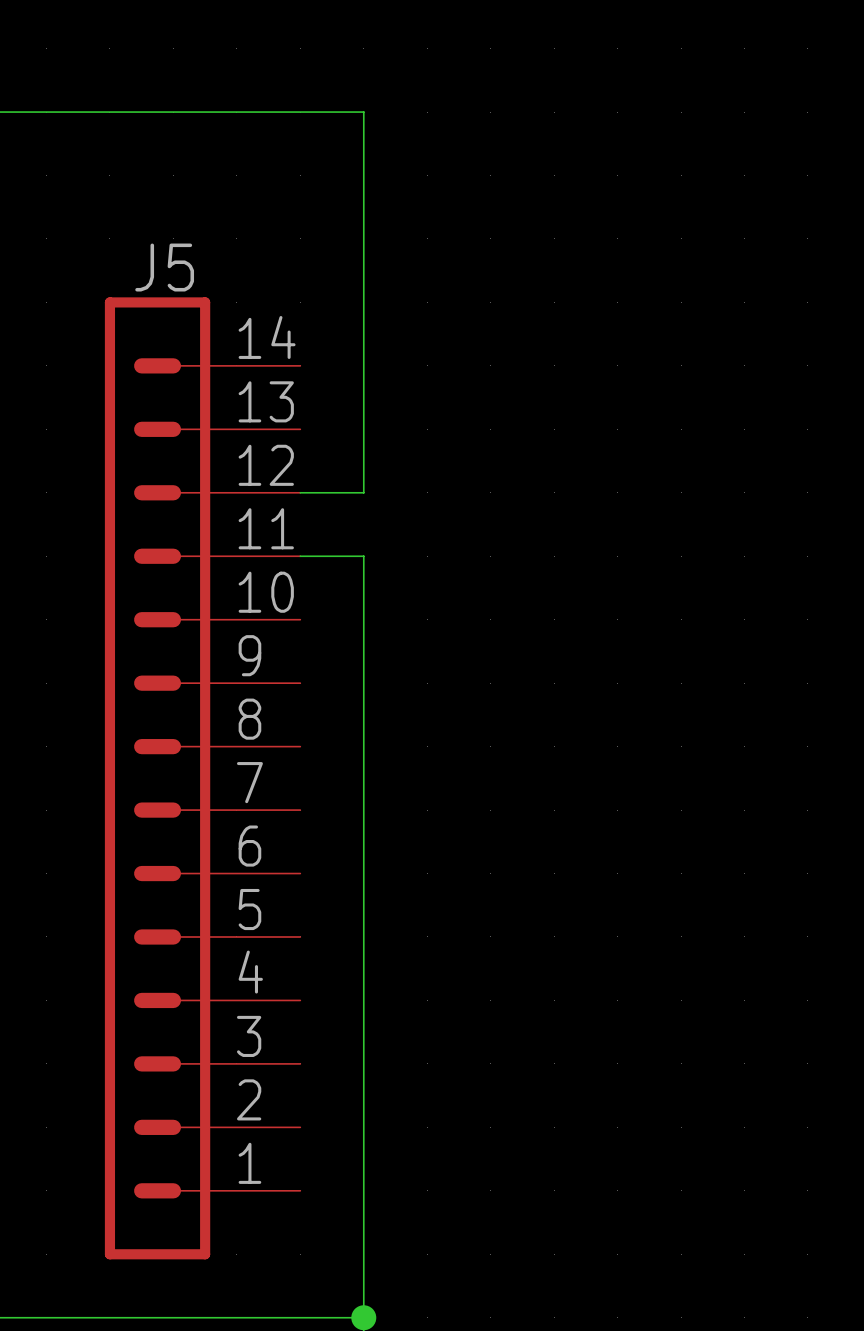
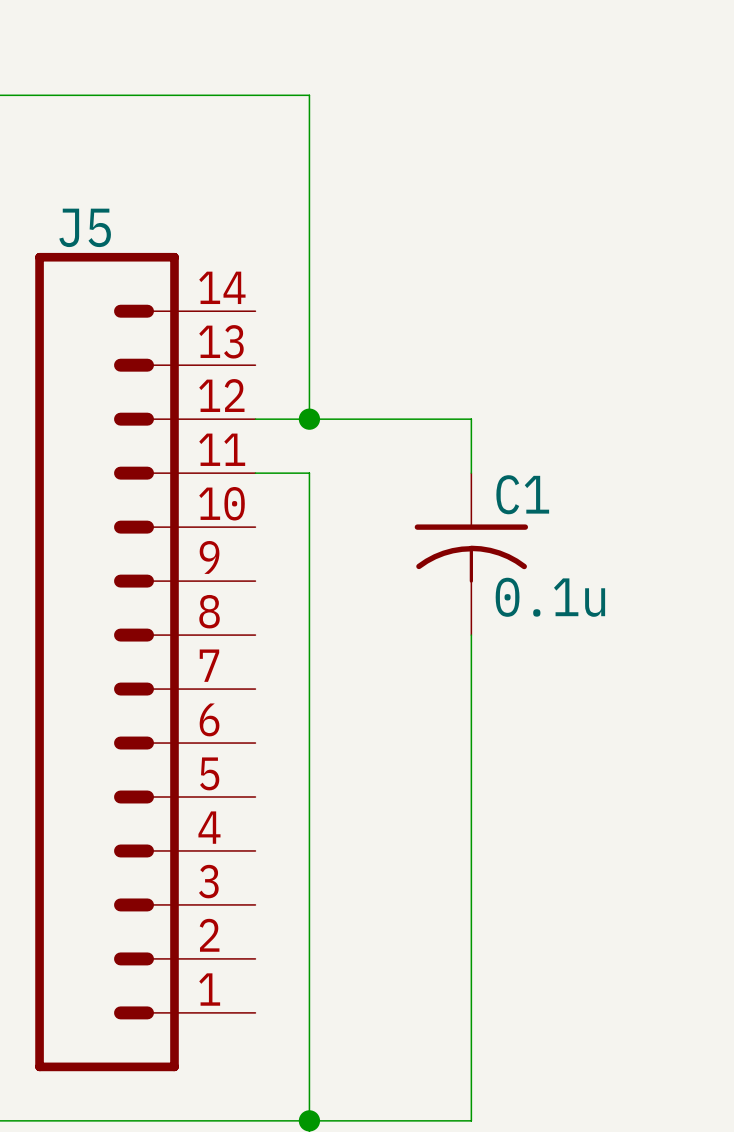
J5 symbol: [104, 297, 301, 1260] -> [35, 252, 256, 1072]
wire: none -> (309, 419) (471, 419) (471, 473)
junction: none -> (309, 419)
C1: none -> 0.1u (471, 554)
wire: none -> (471, 635) (471, 1120) (309, 1120)

